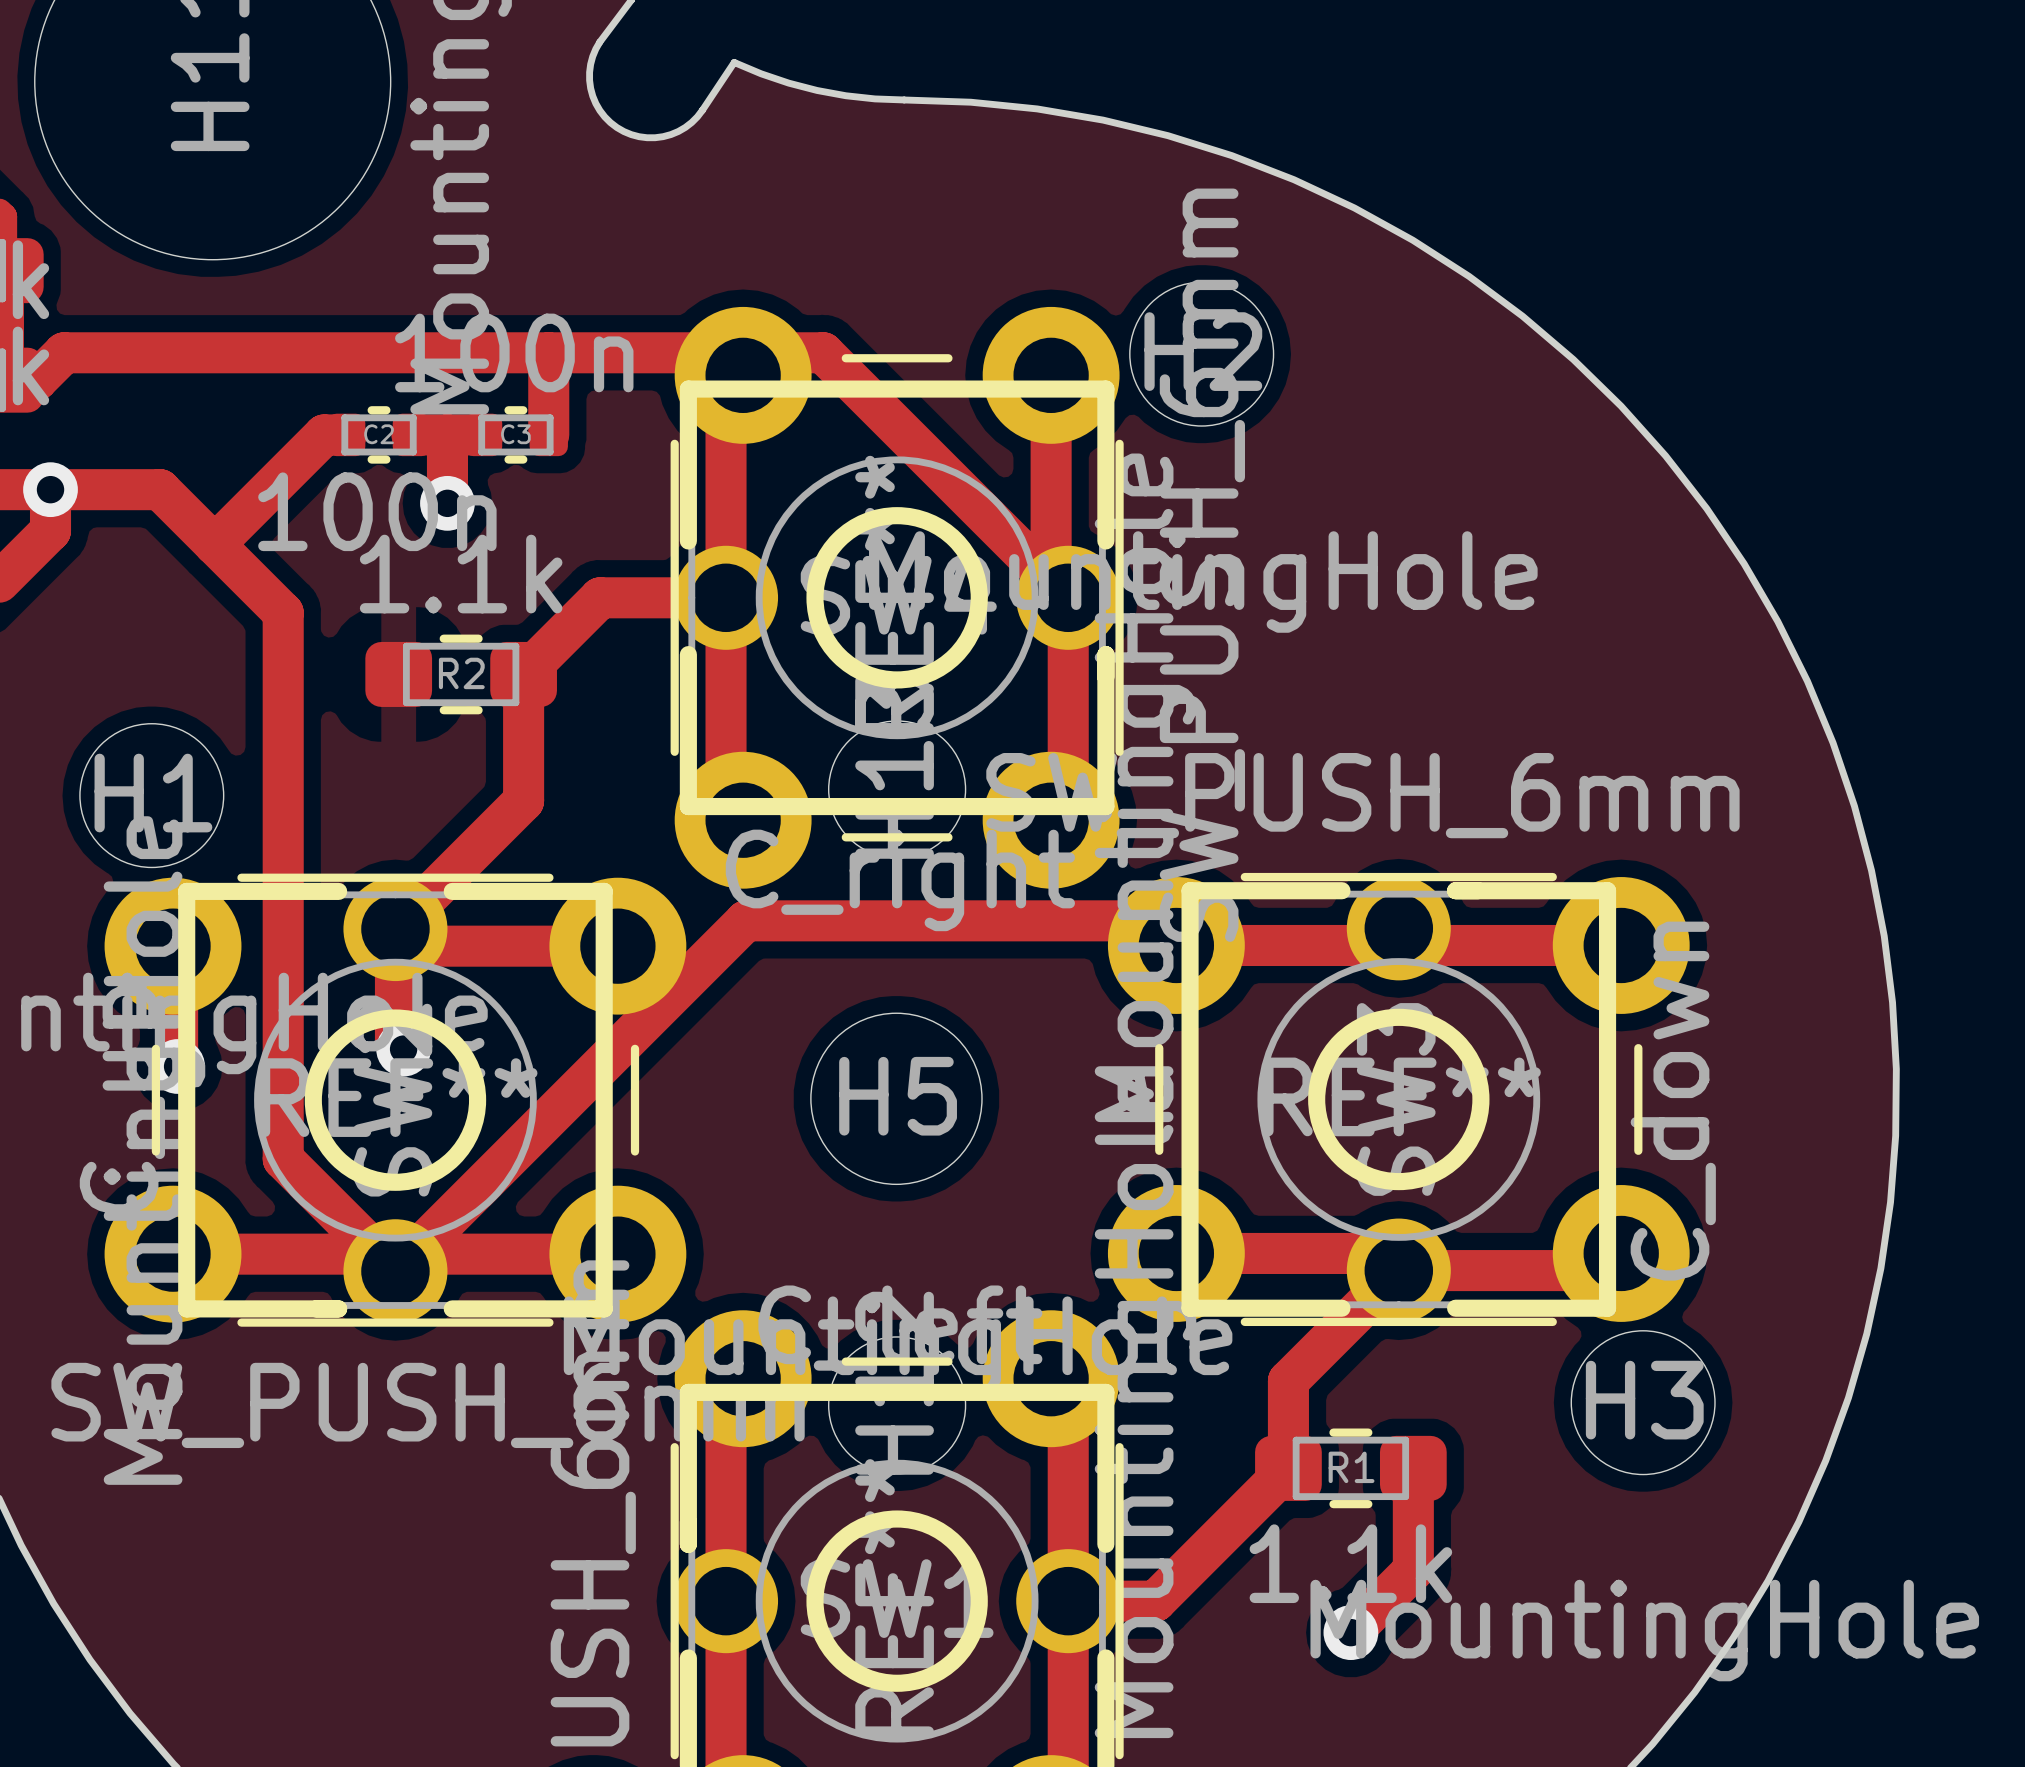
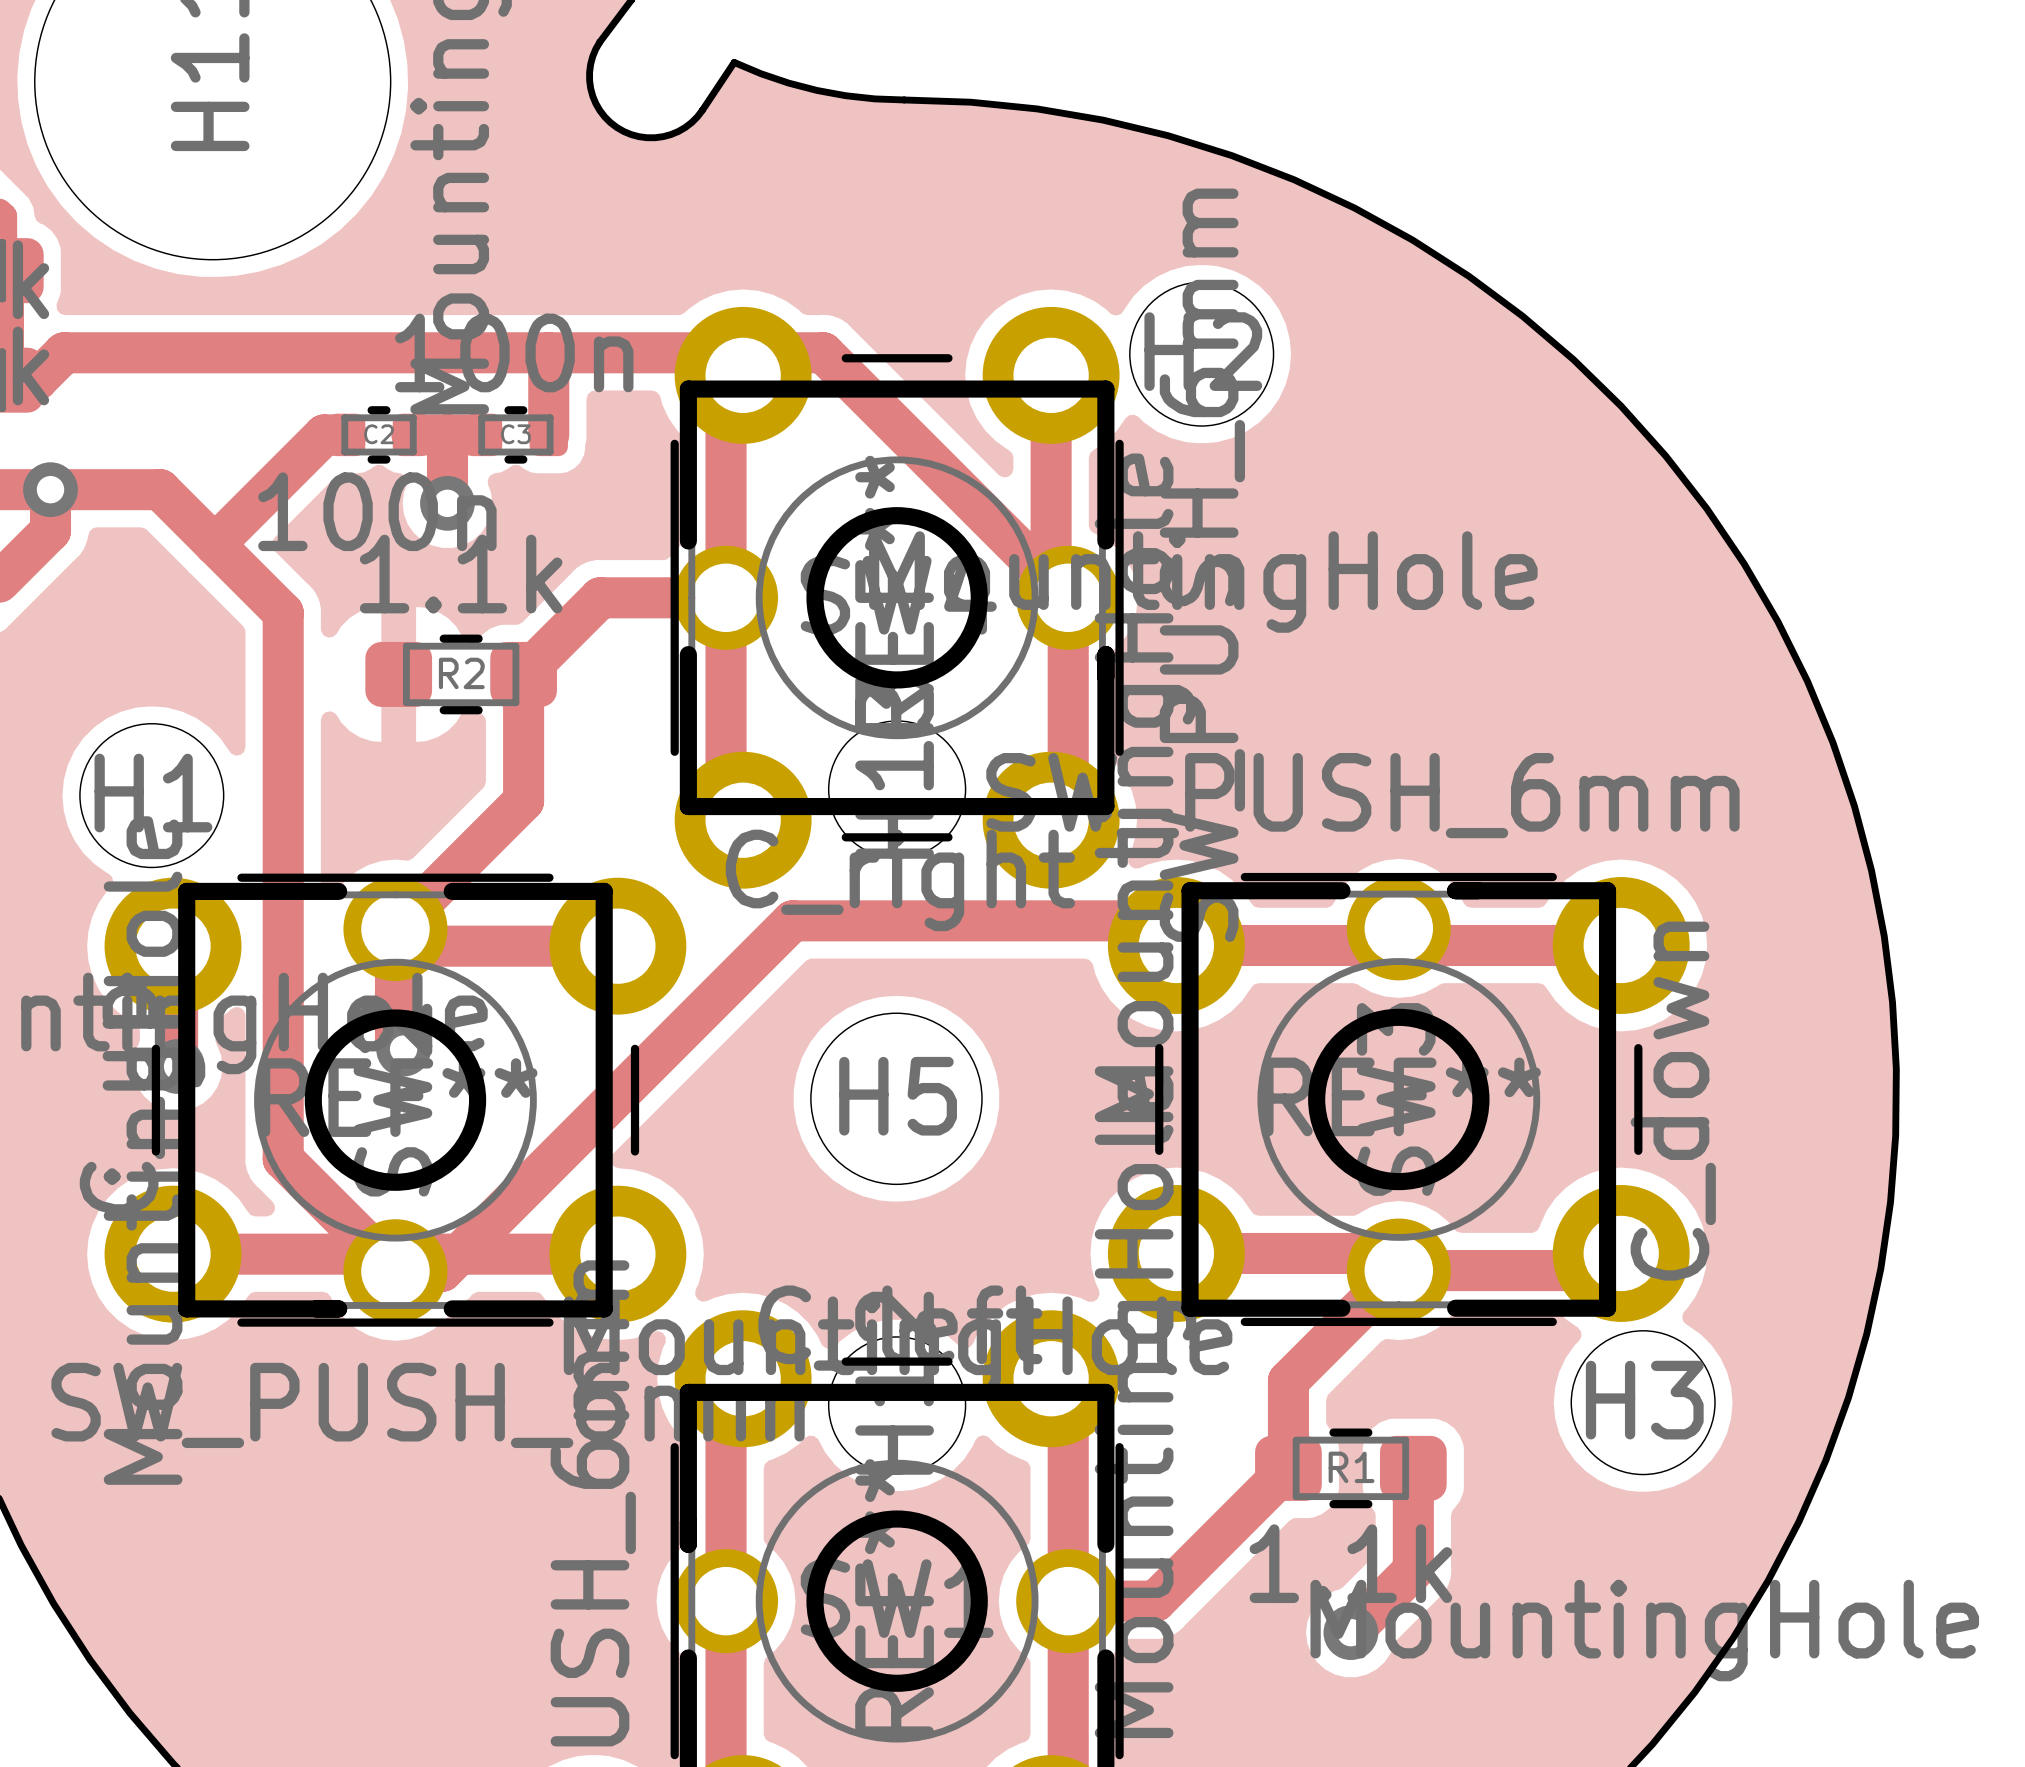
track: (792, 920) (745, 920) (412, 1254) -> (792, 920) (442, 1271) (395, 1271)

